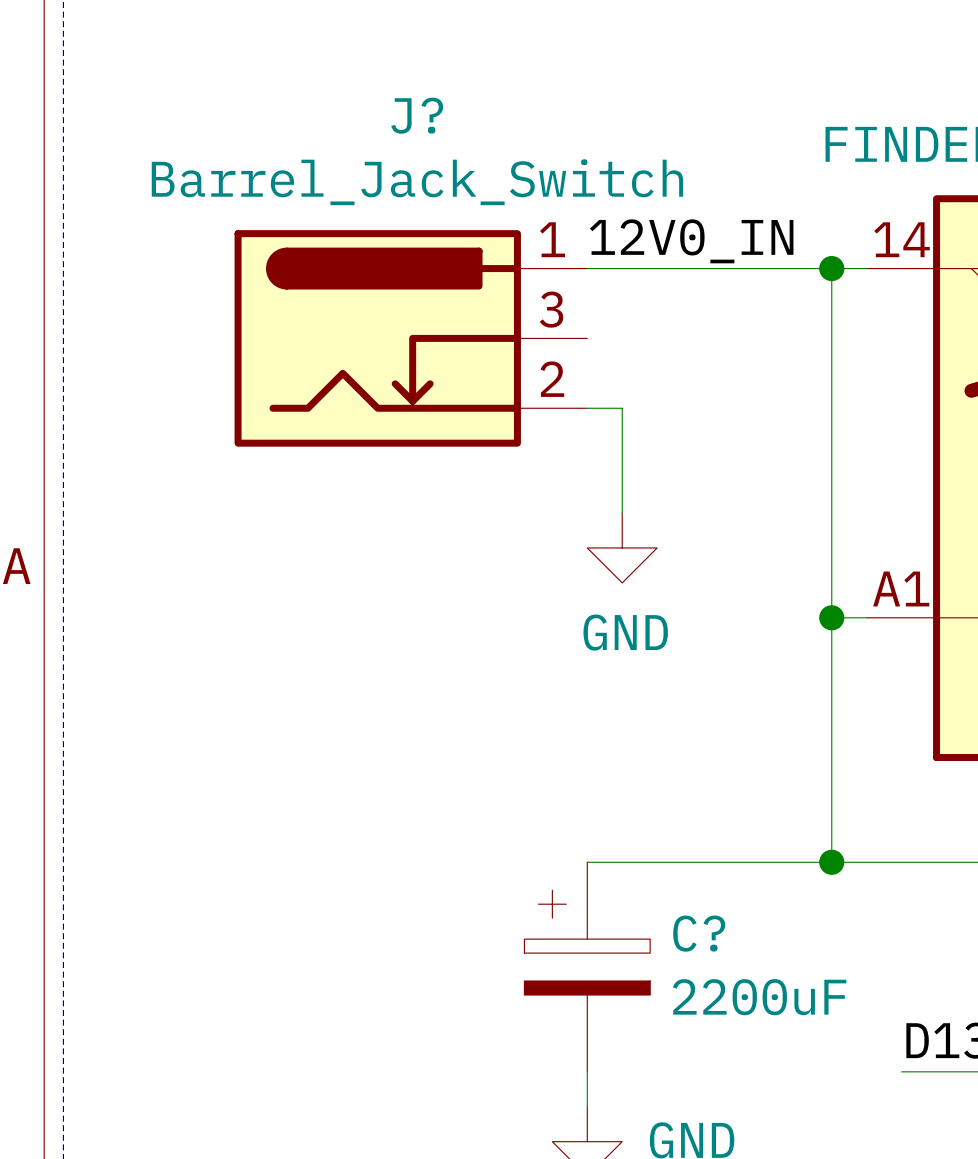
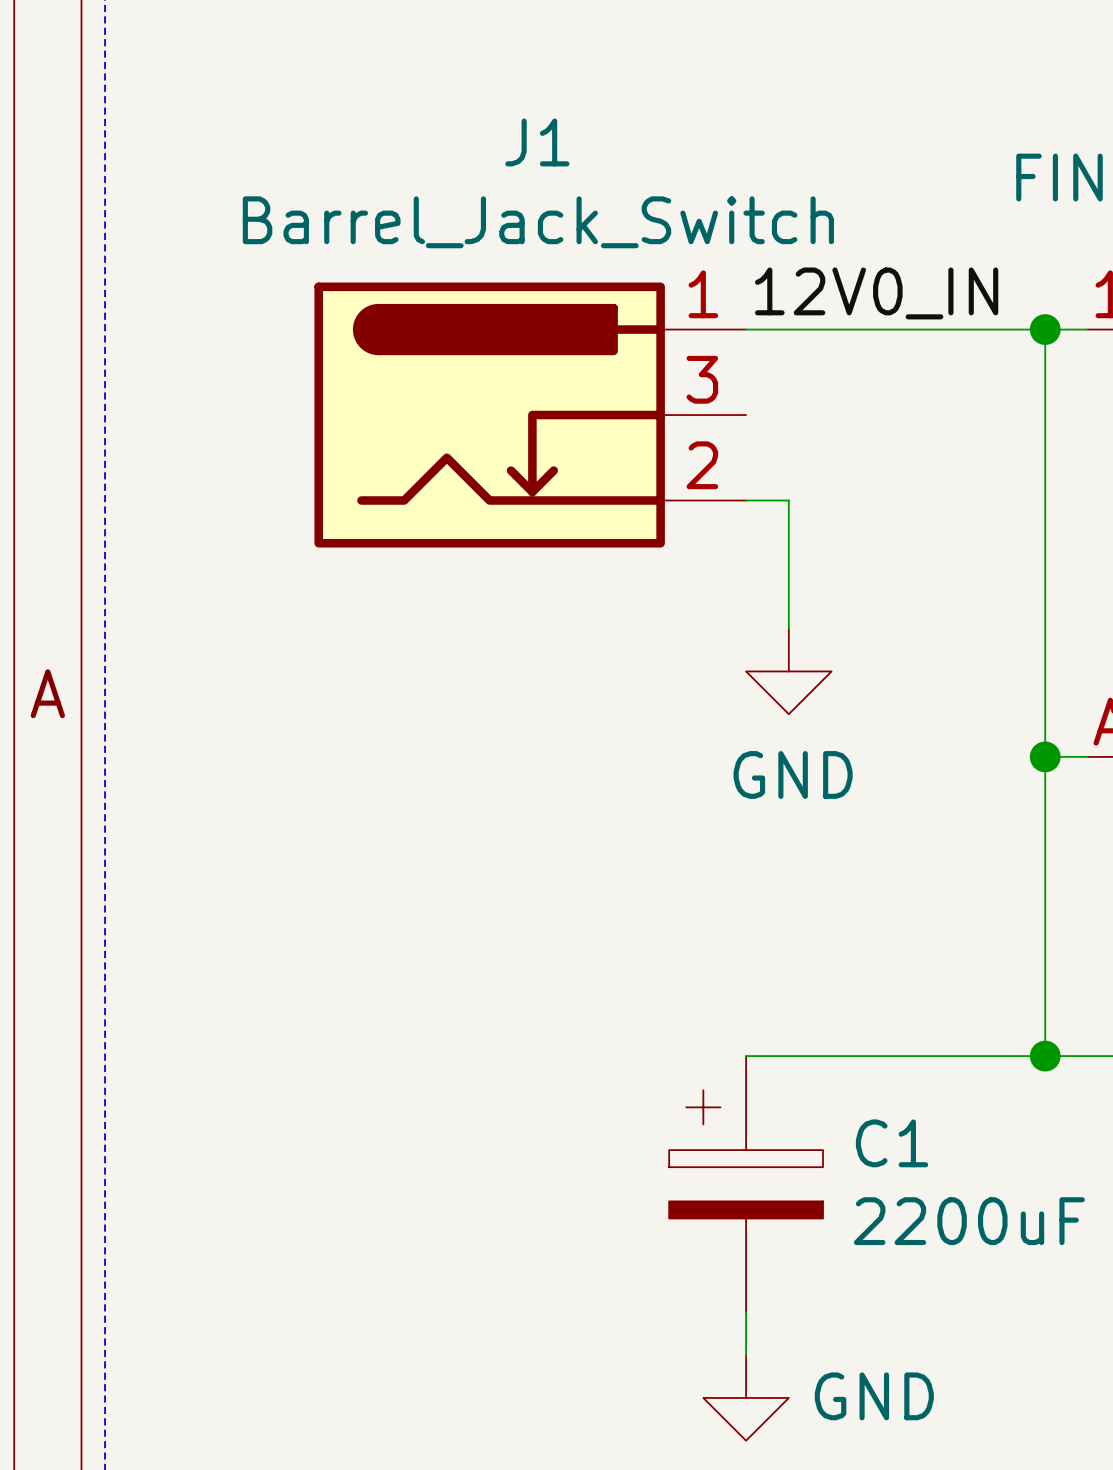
J? name: J? (417, 115) -> J1 (537, 142)
C? name: C? (699, 933) -> C1 (892, 1143)

